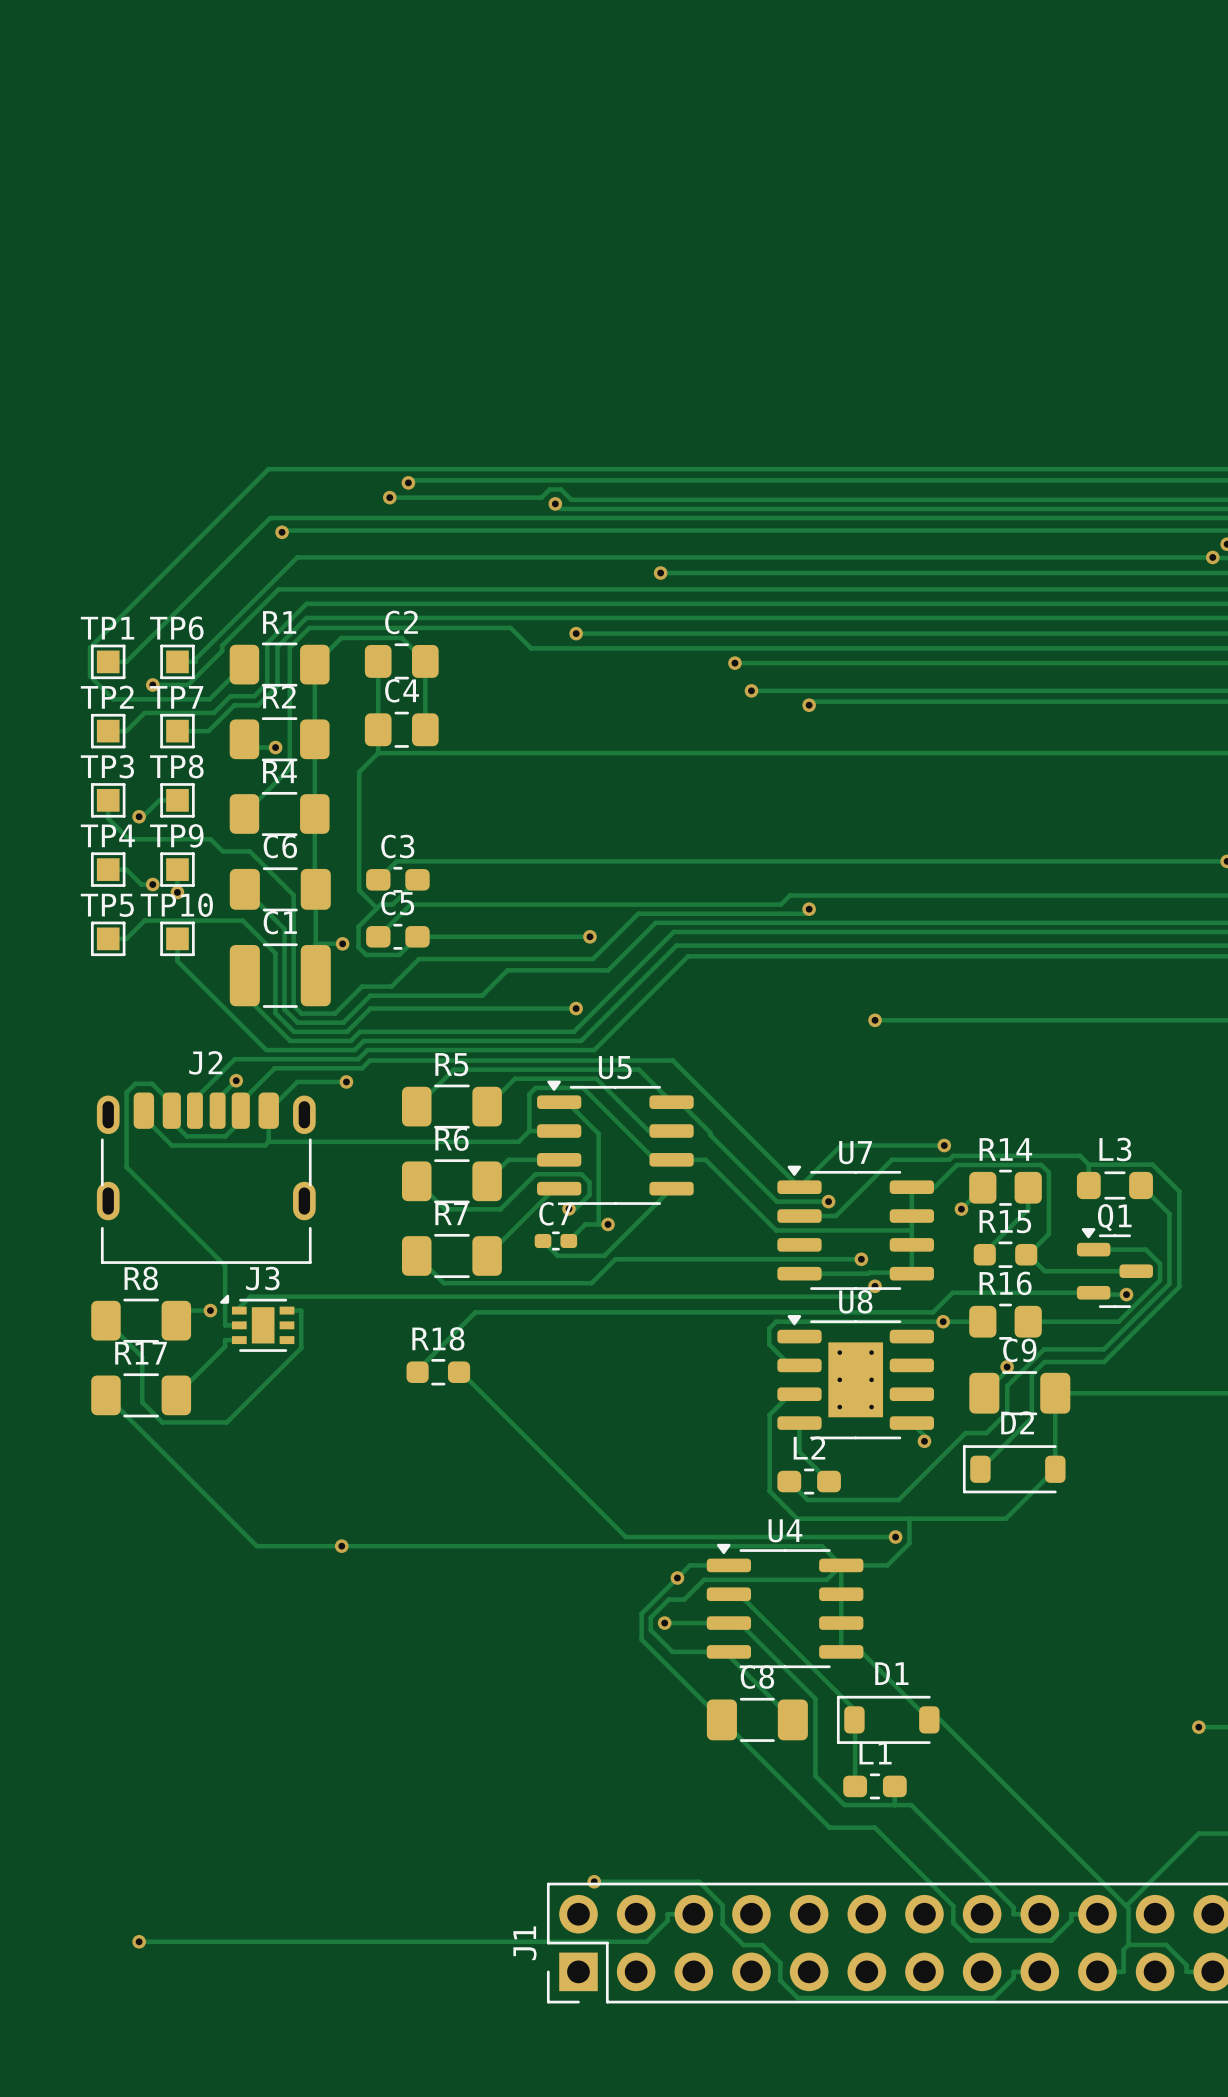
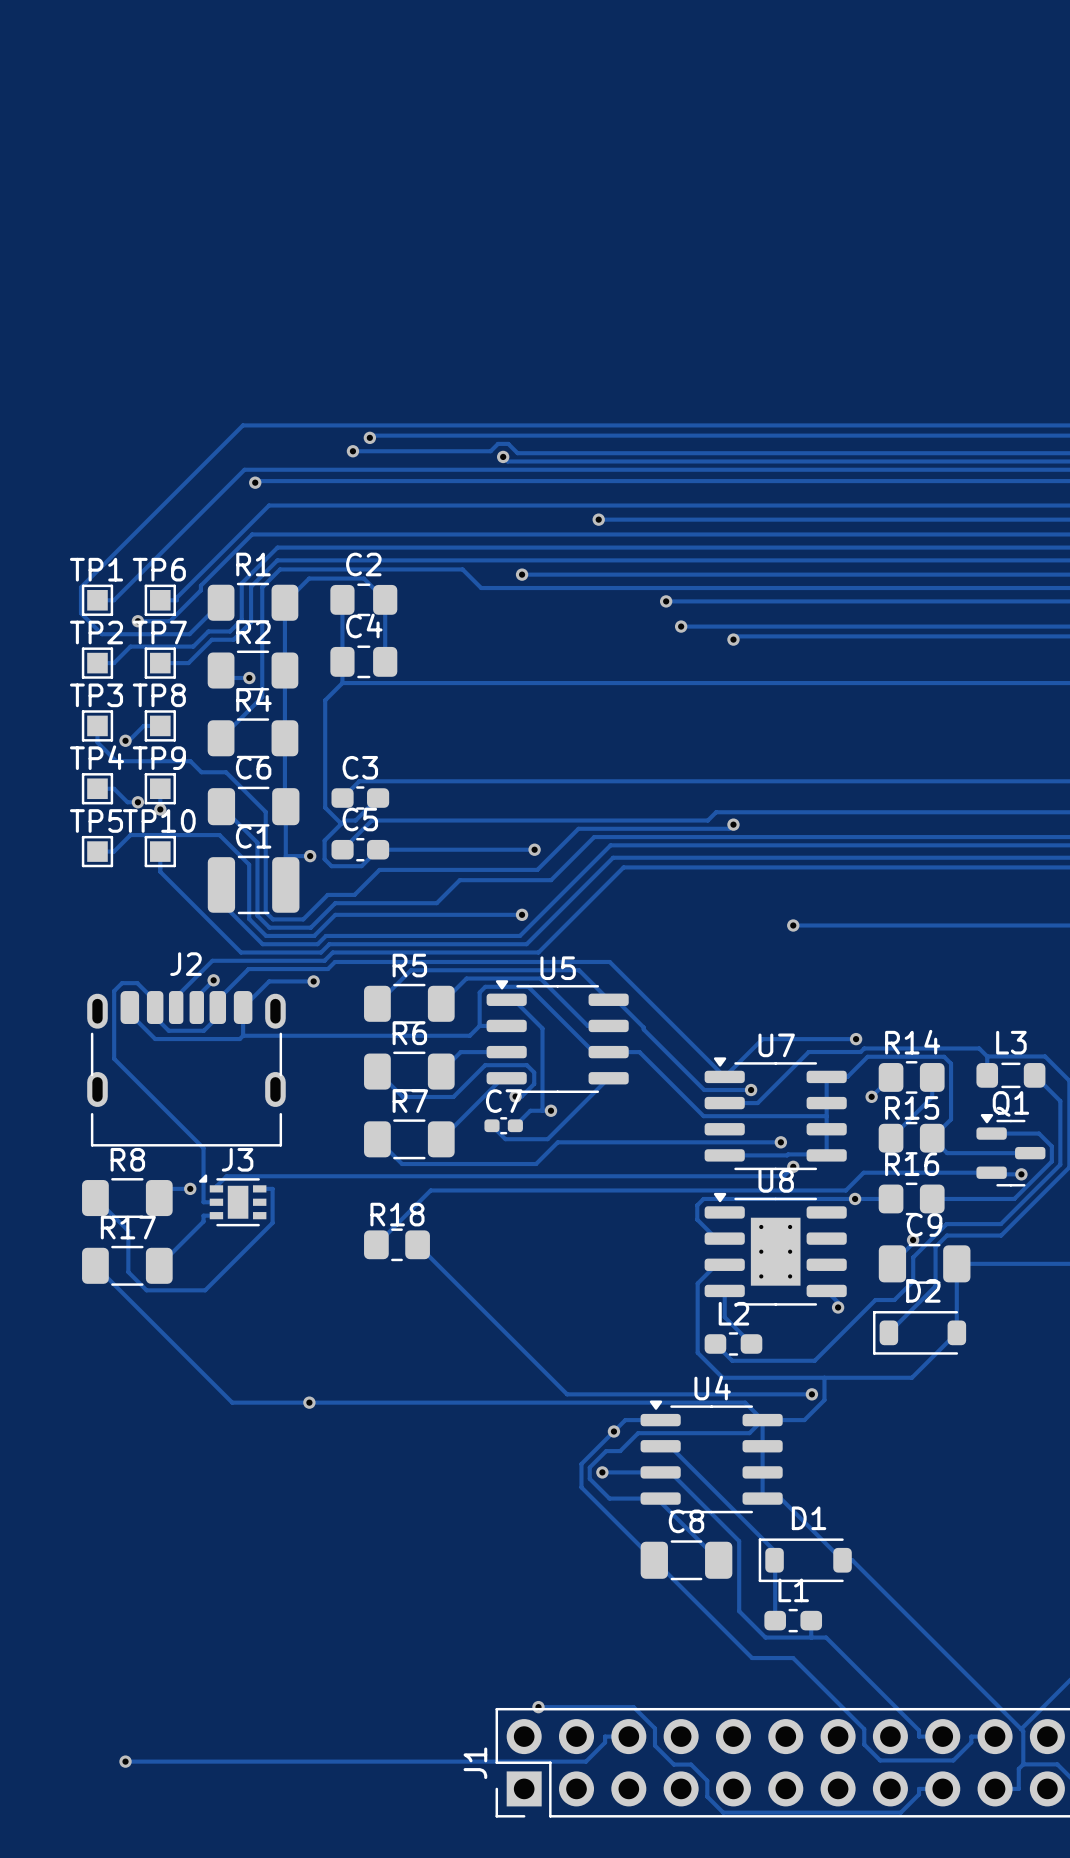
R15 footprint: [973, 1241, 1038, 1268] -> [878, 1121, 945, 1155]
R18 footprint: [406, 1358, 471, 1386] -> [364, 1228, 430, 1262]

